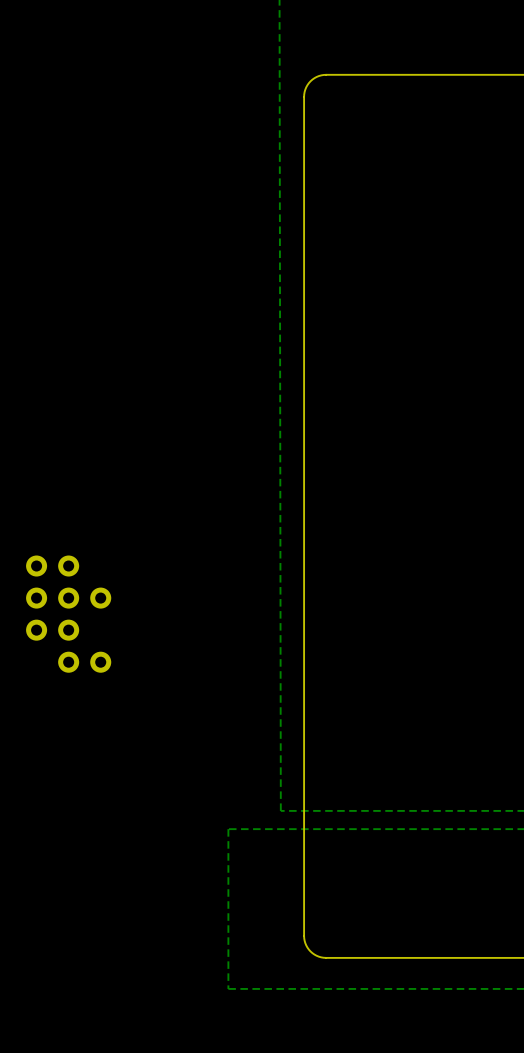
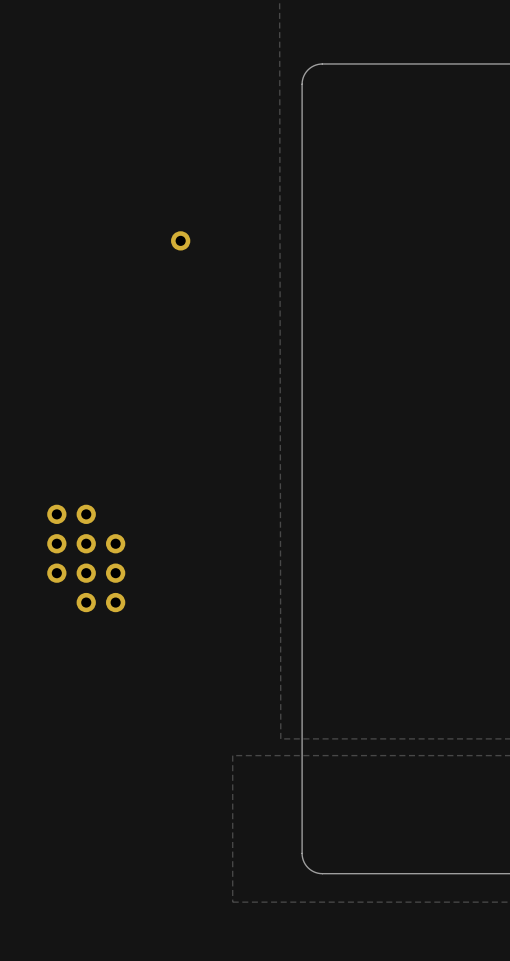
part: none -> (180, 240)
part: none -> (115, 573)

